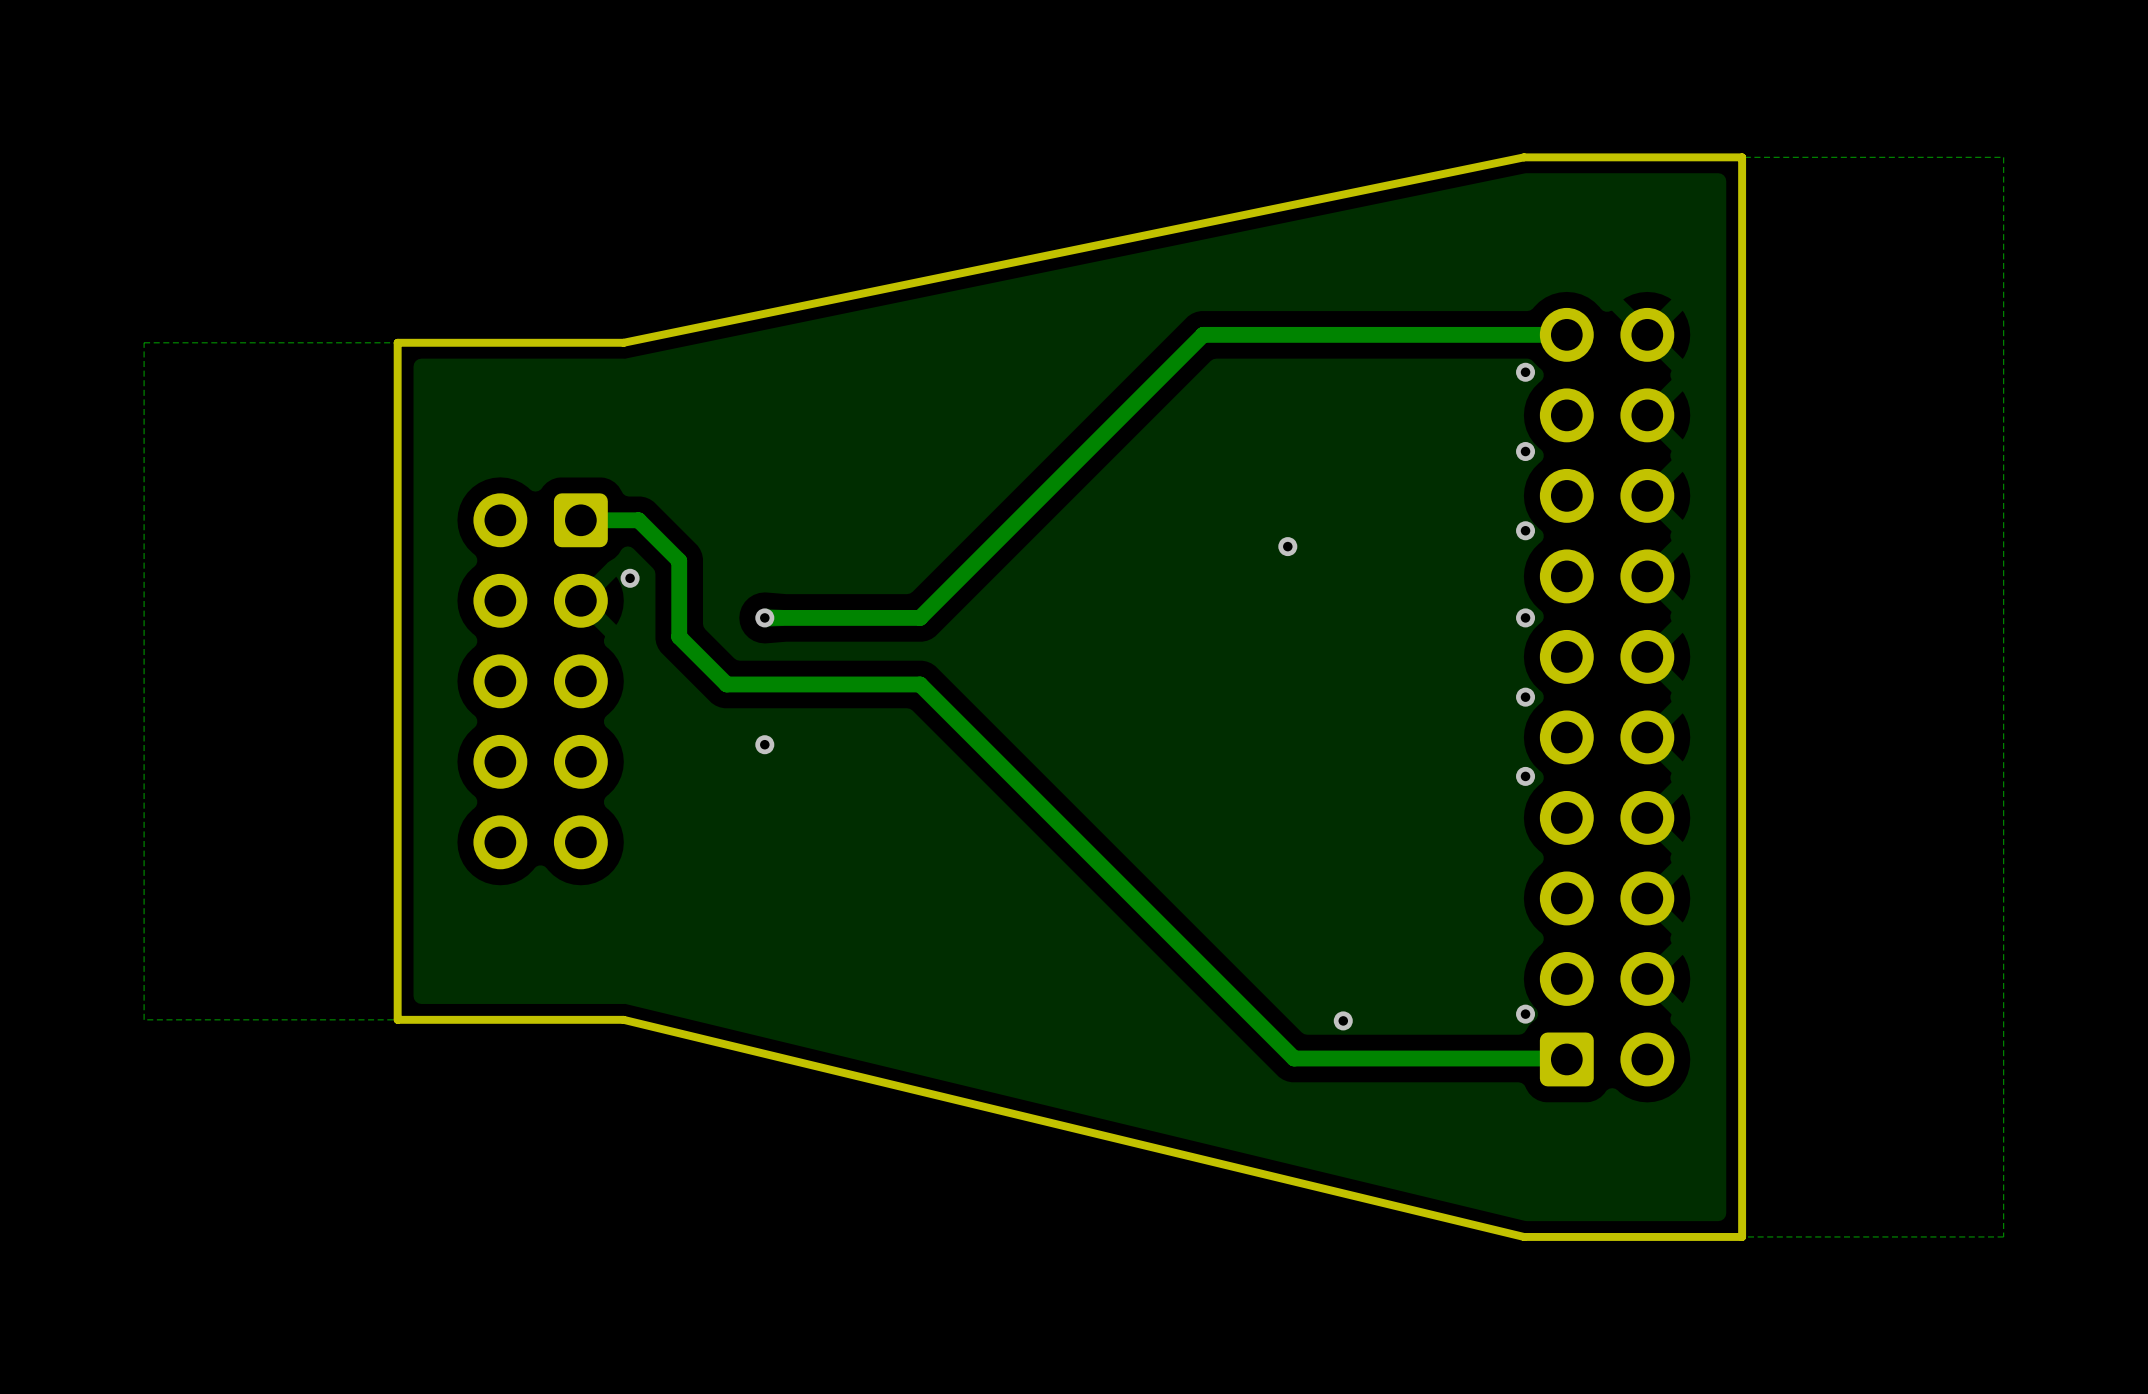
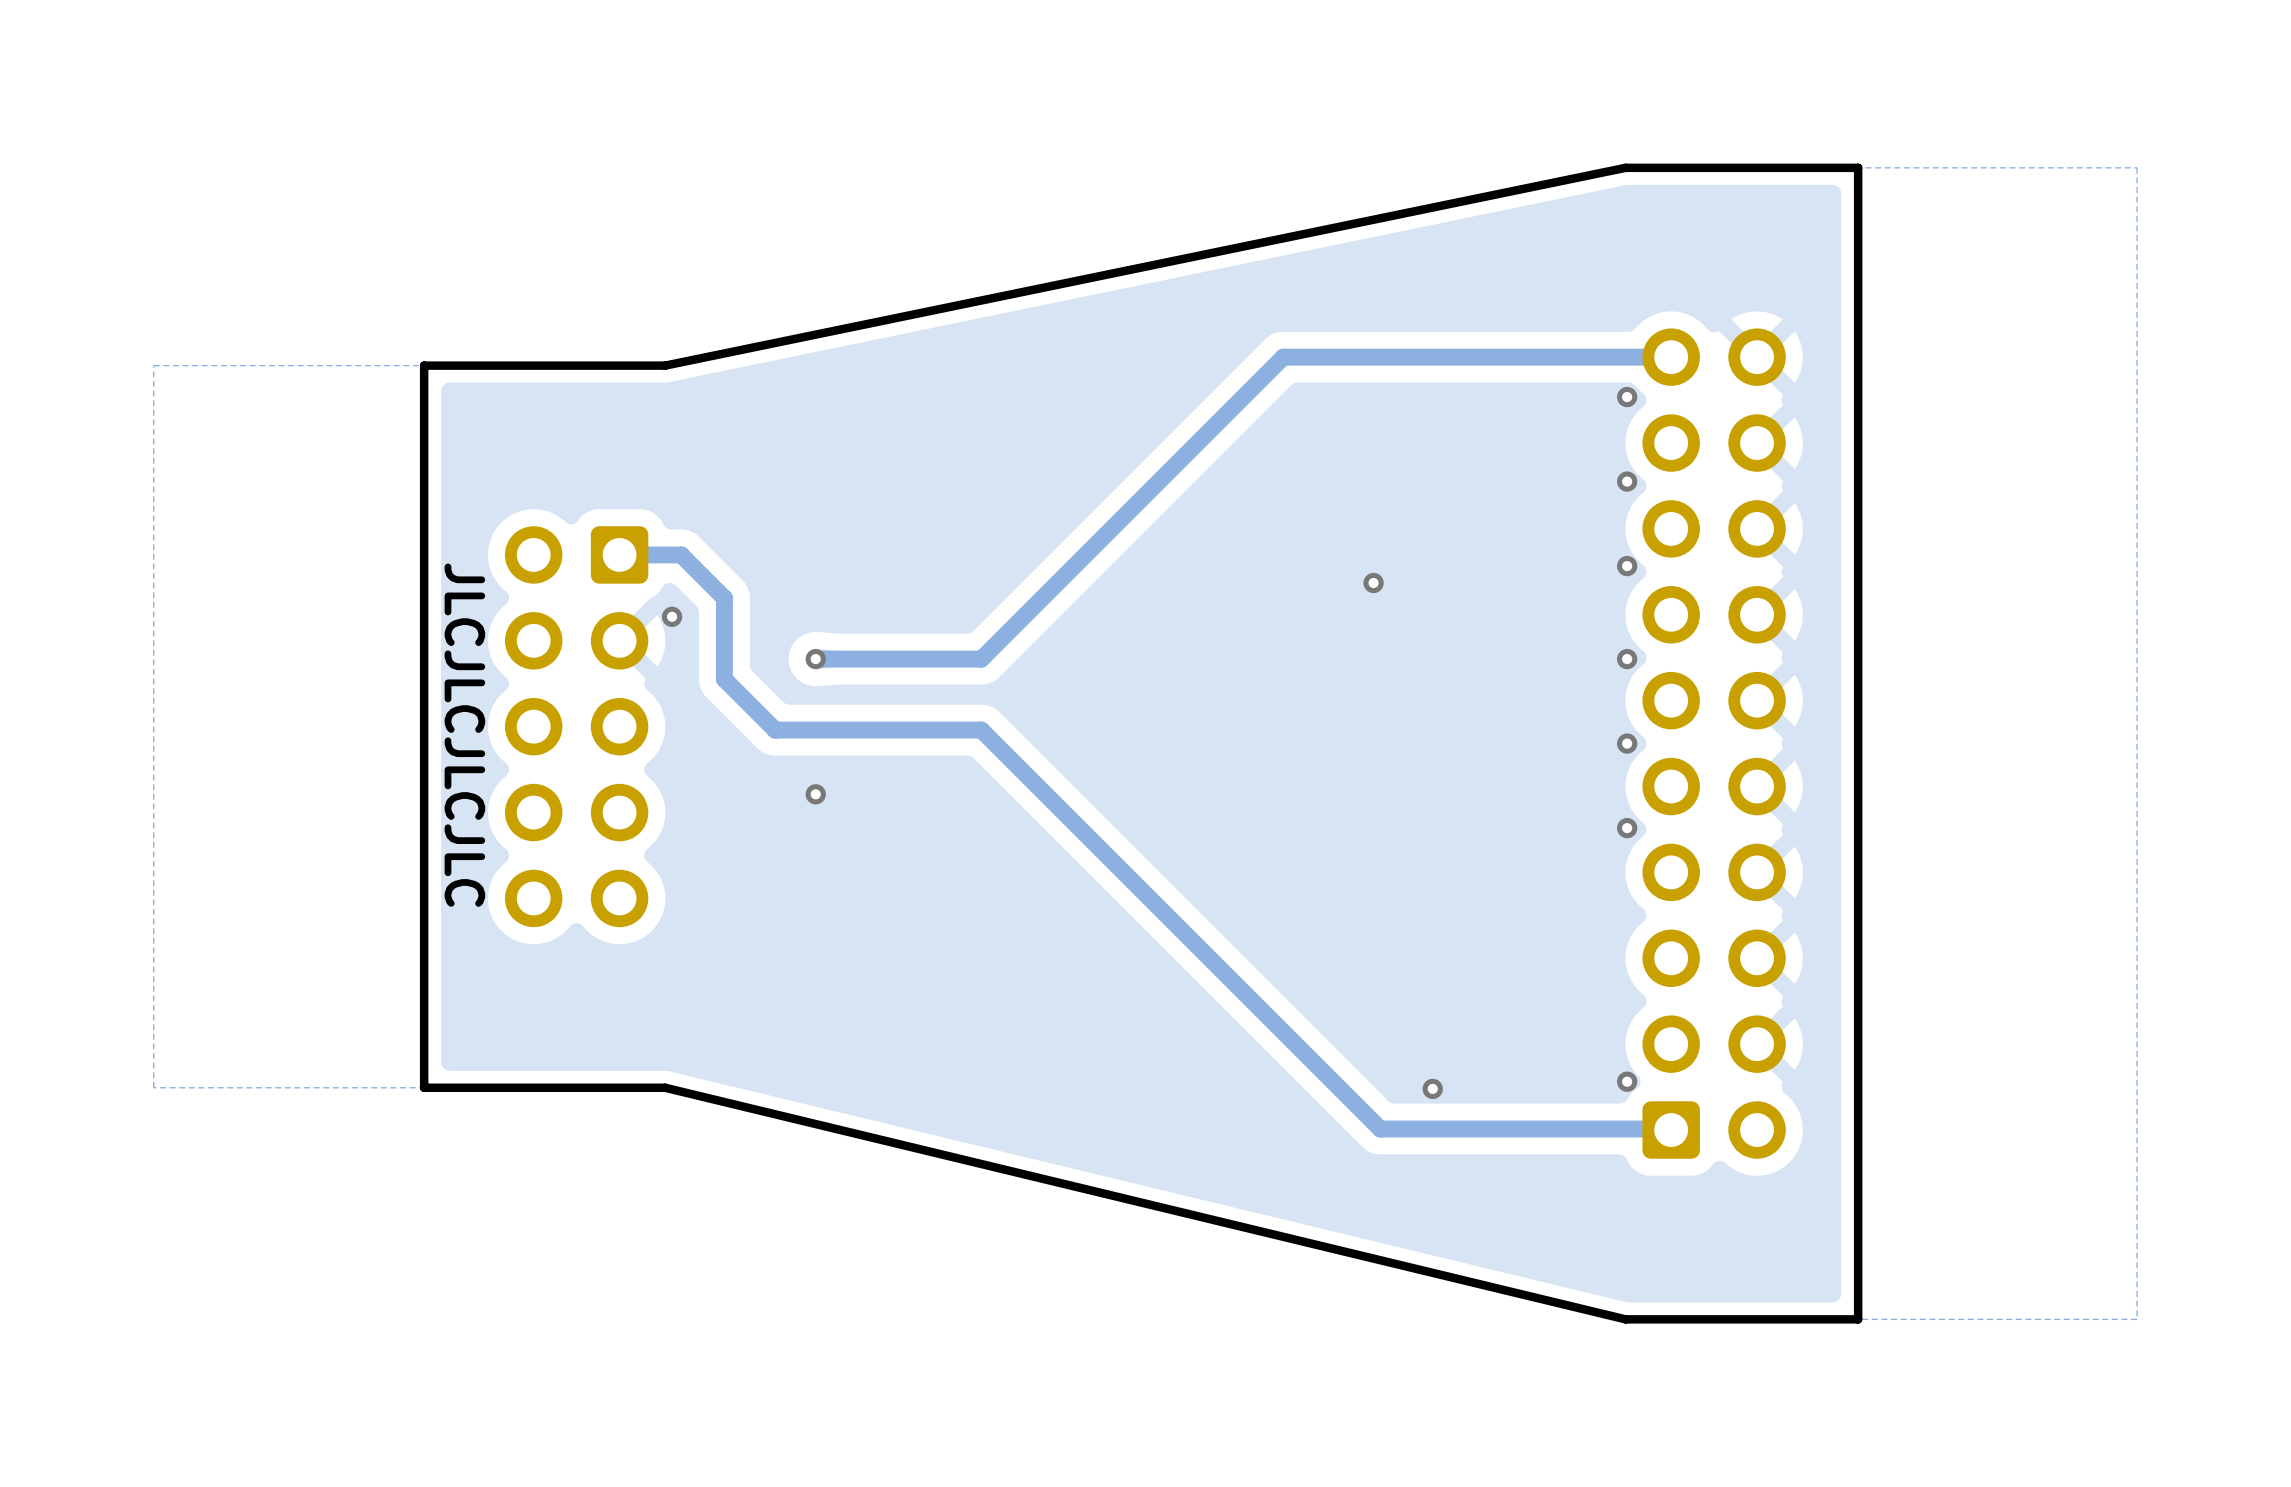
text: none -> JLCJLCJLCJLC (464, 735)

